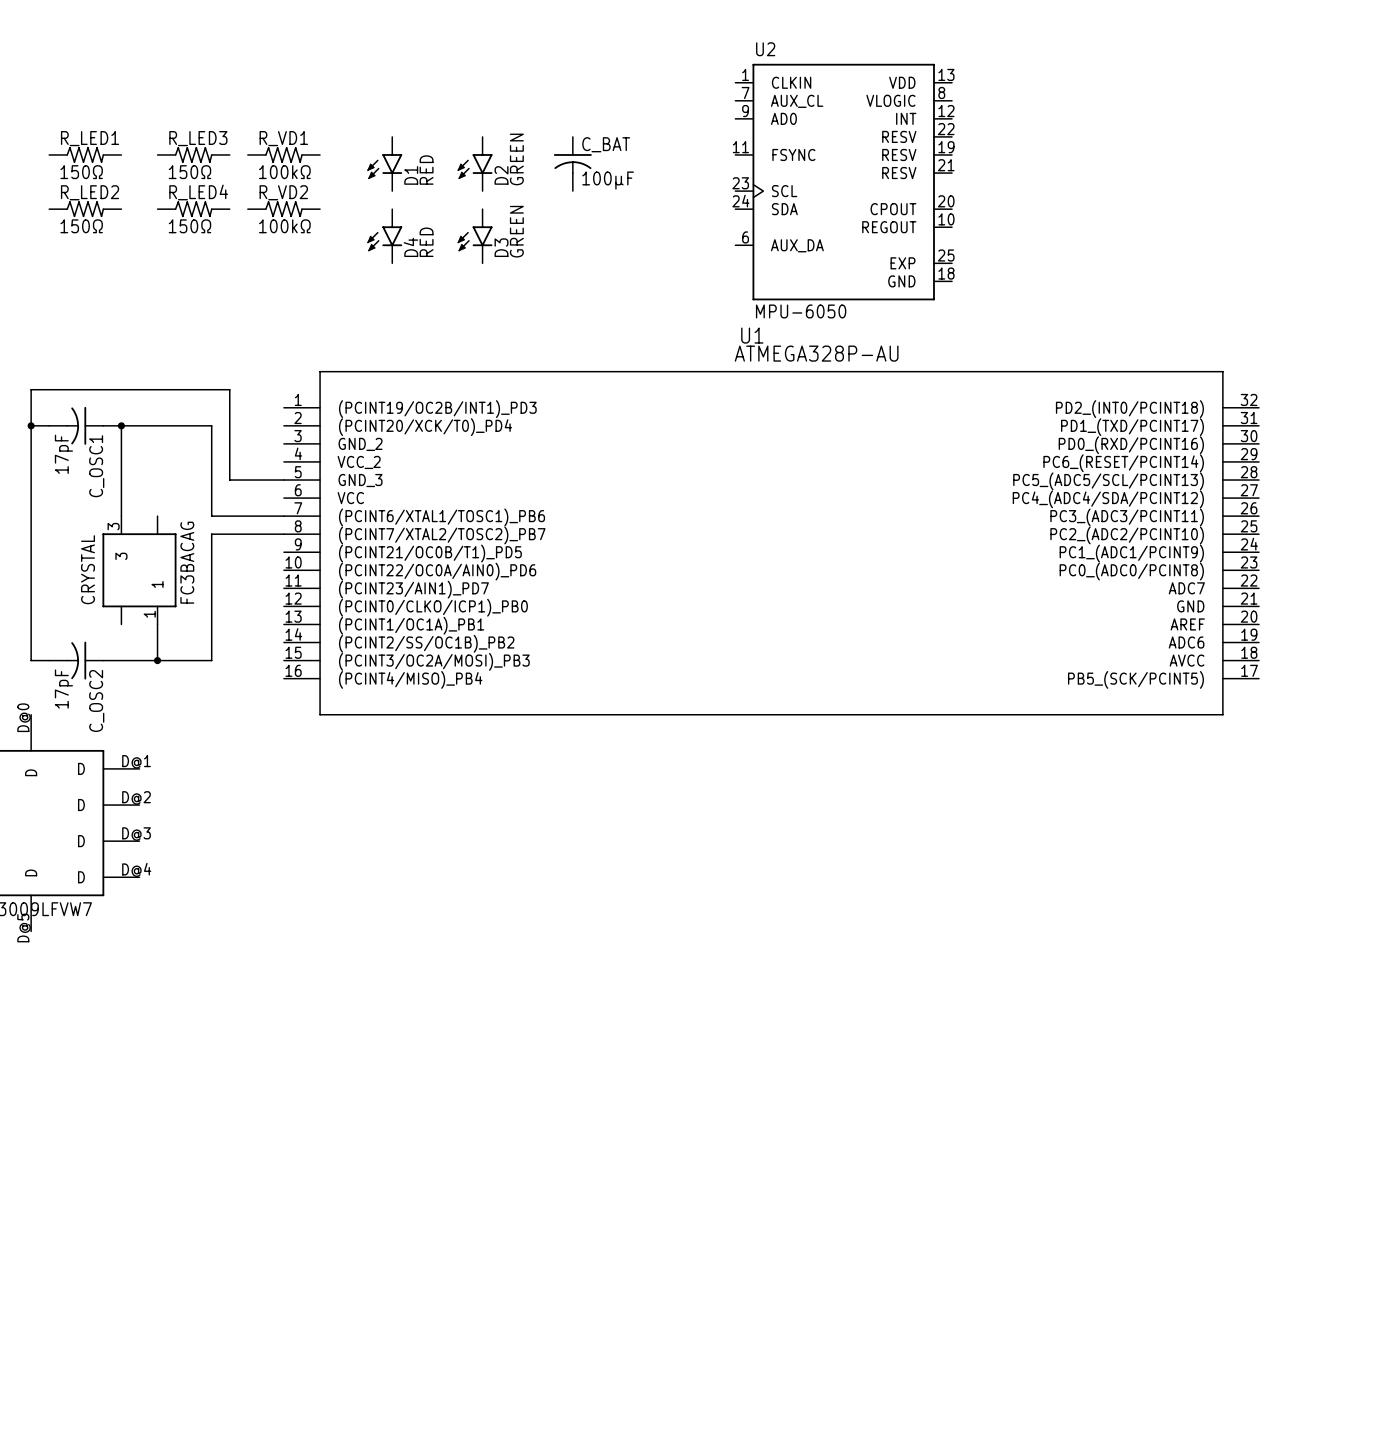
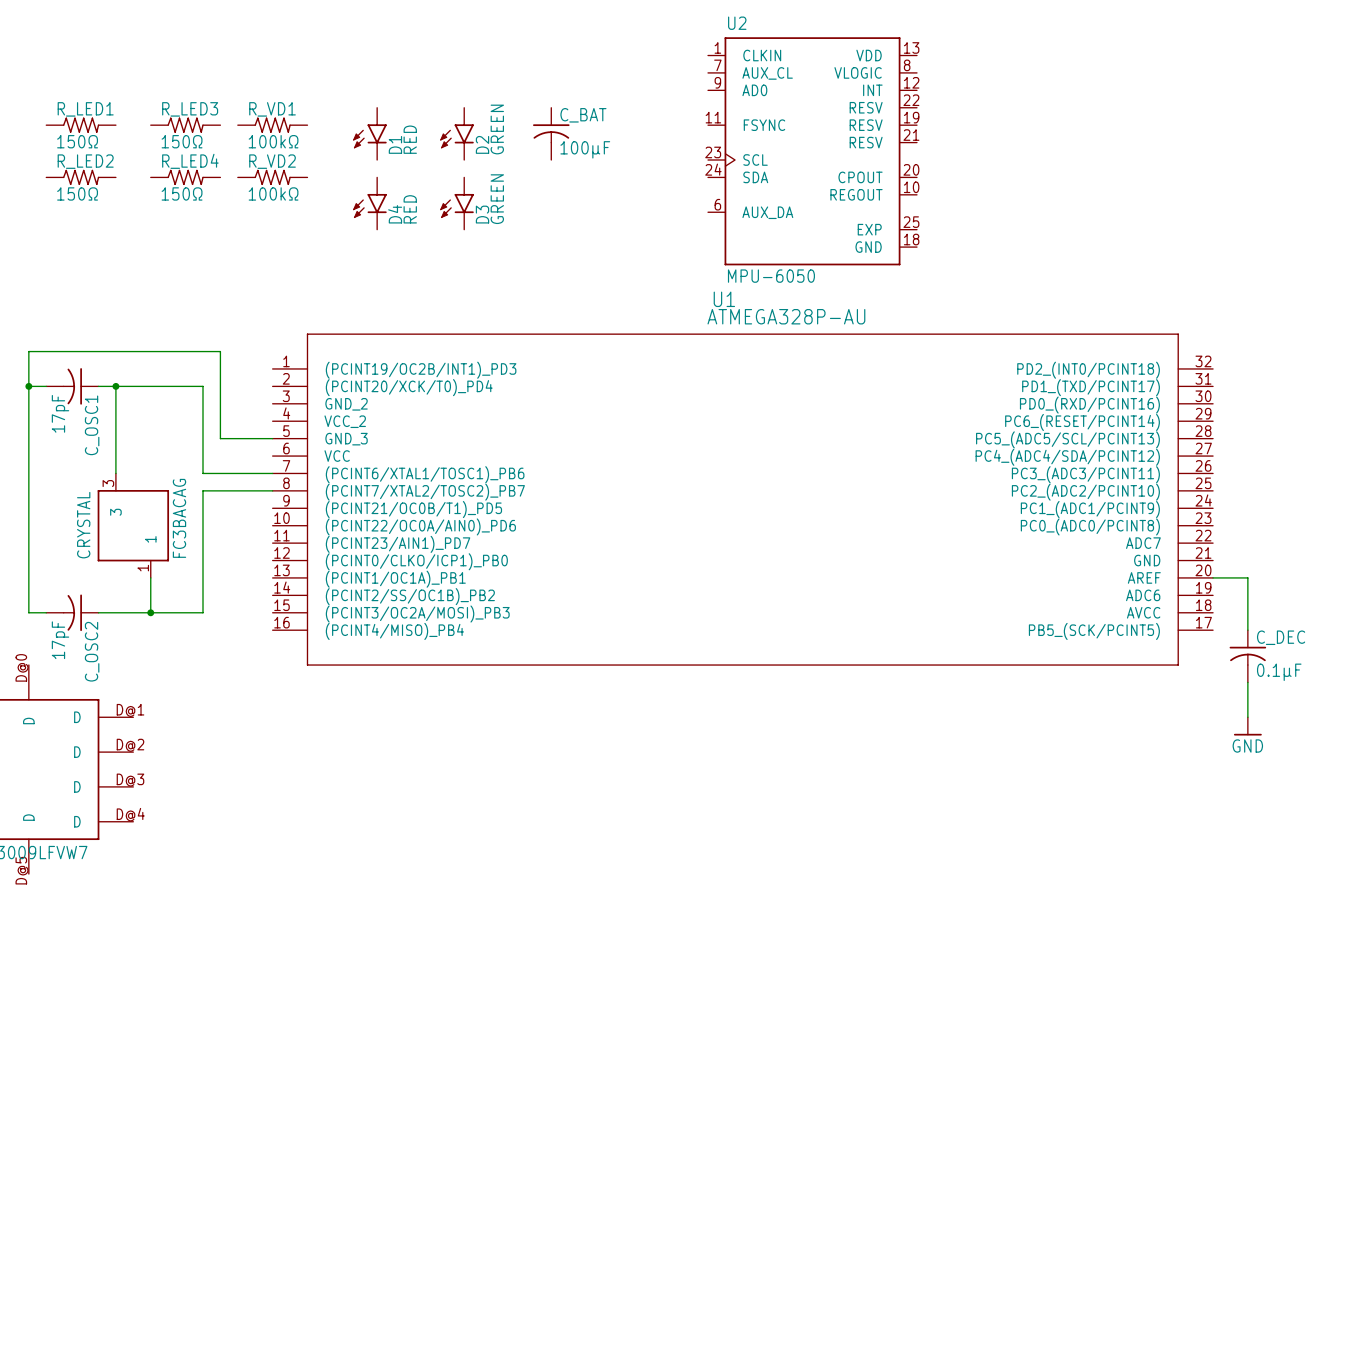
CRYSTAL symbol: [102, 516, 177, 625] -> [97, 473, 170, 578]
wire: none -> (1213, 577) (1247, 577) (1247, 630)
C_DEC: none -> 0.1μF (1247, 656)
wire: none -> (1247, 682) (1247, 717)
power symbol: none -> GND (1247, 726)

